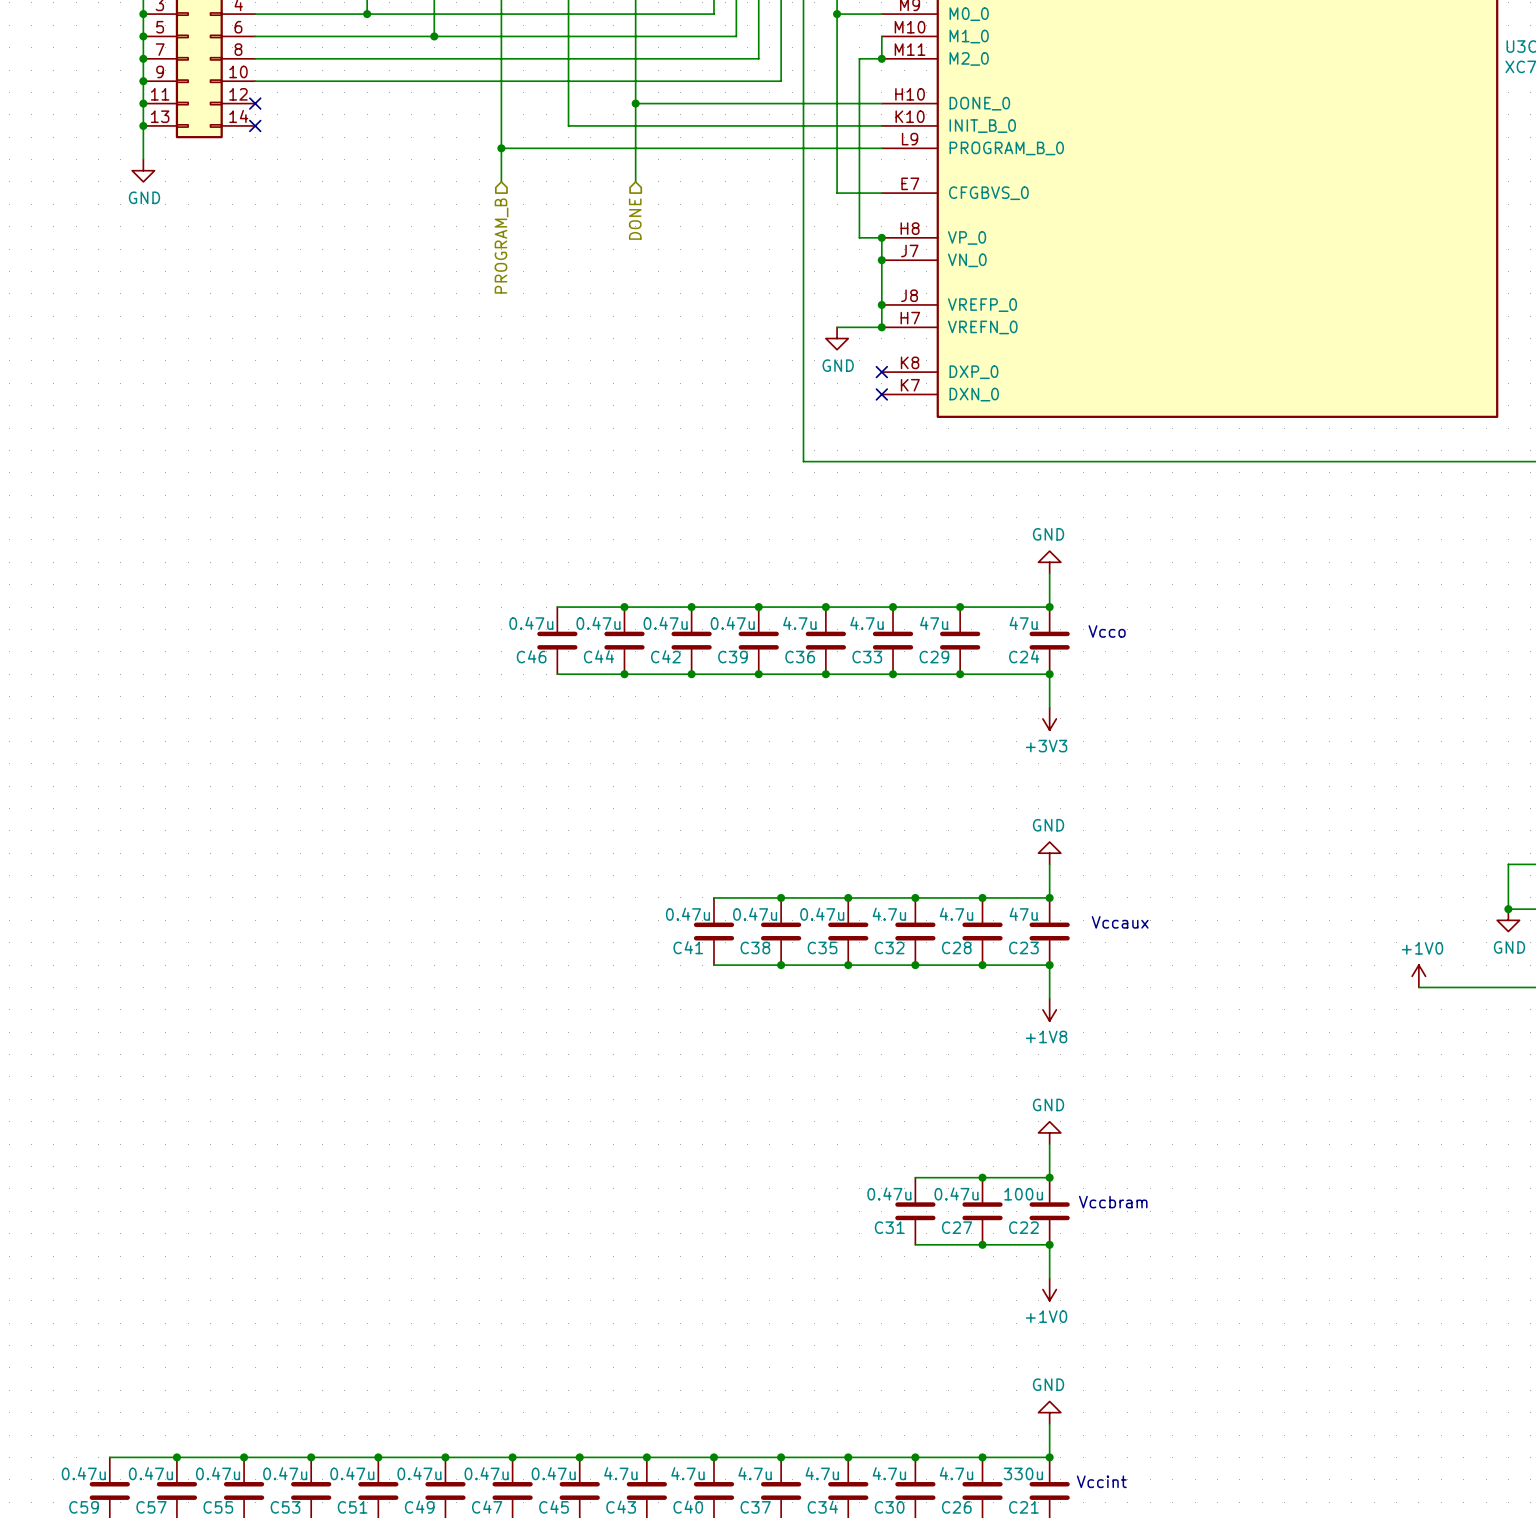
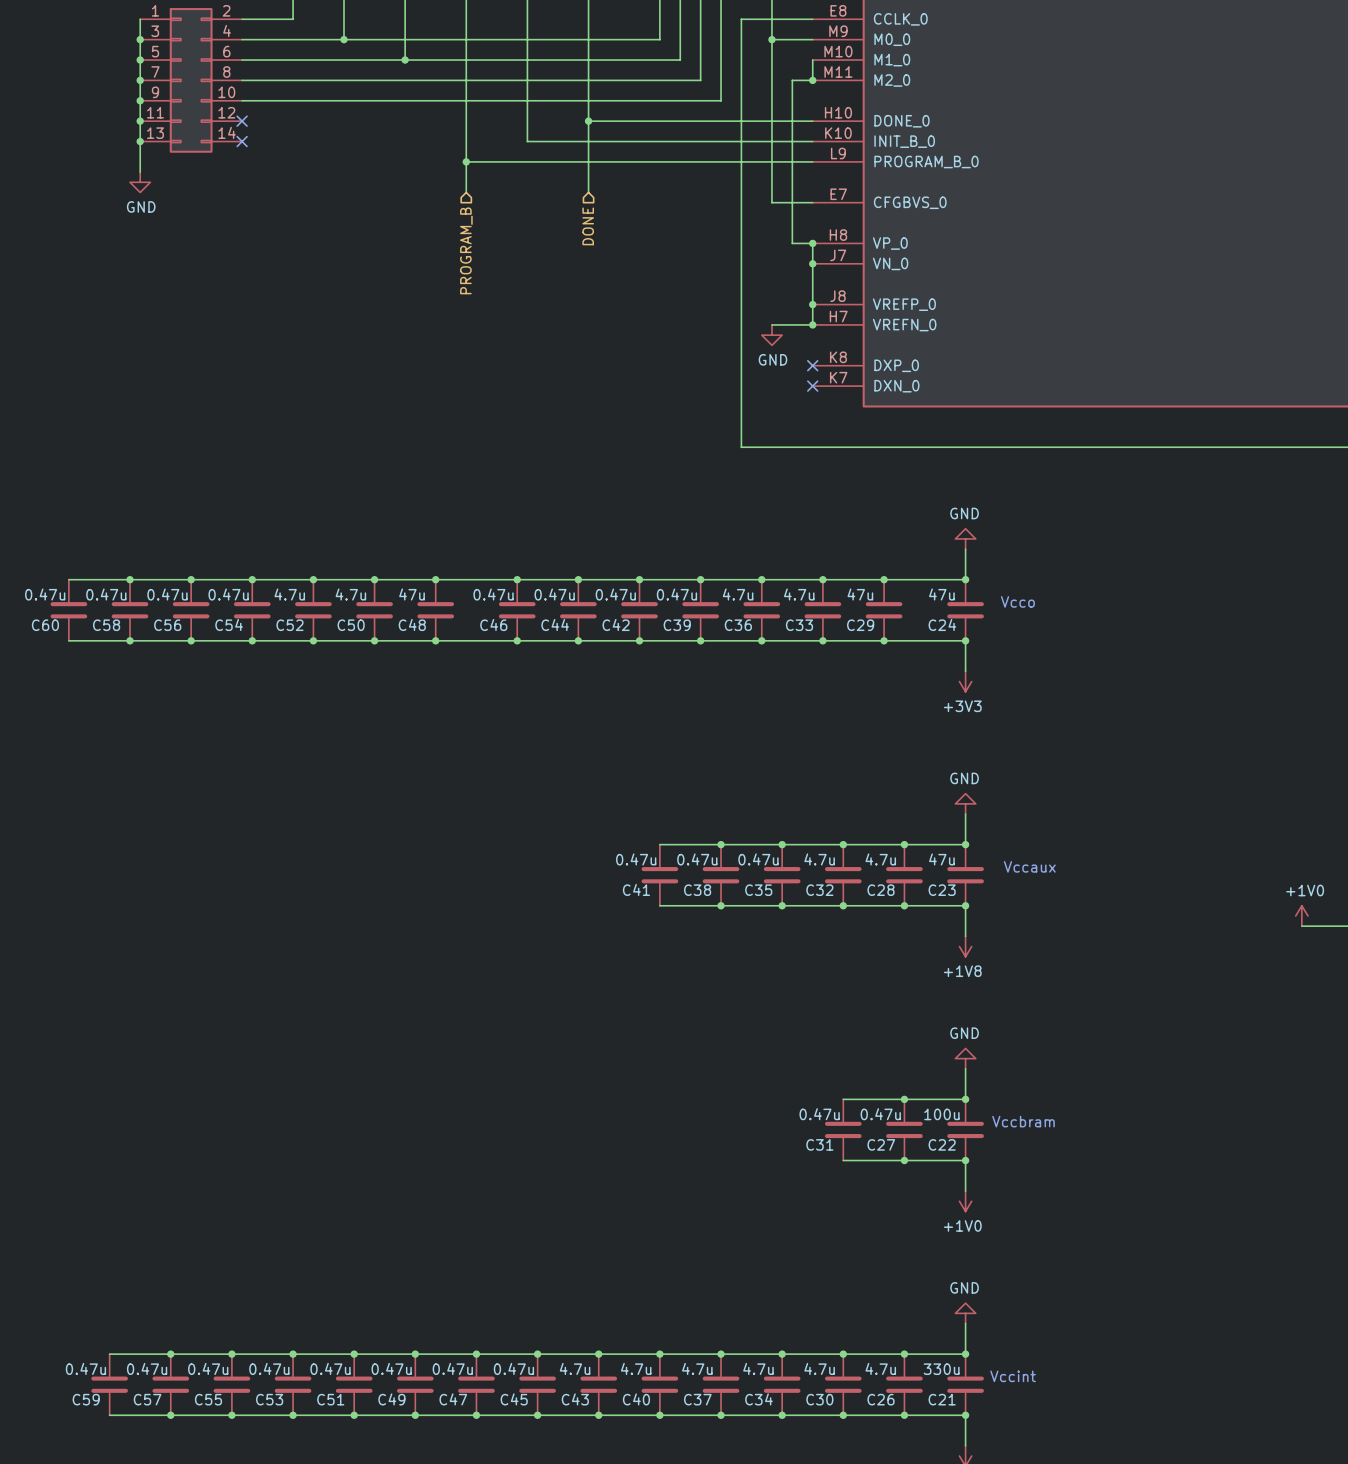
wire: none -> (68, 579) (517, 579)
junction: none -> (130, 579)
junction: none -> (191, 579)
junction: none -> (252, 579)
junction: none -> (313, 579)
junction: none -> (374, 579)
junction: none -> (435, 579)
junction: none -> (517, 579)
C60: none -> 0.47u (68, 610)
C58: none -> 0.47u (130, 610)
C56: none -> 0.47u (191, 610)
C54: none -> 0.47u (252, 610)
C52: none -> 4.7u (313, 610)
C50: none -> 4.7u (374, 610)
C48: none -> 47u (435, 610)
wire: none -> (68, 640) (517, 640)
junction: none -> (130, 640)
junction: none -> (191, 640)
junction: none -> (252, 640)
junction: none -> (313, 640)
junction: none -> (374, 640)
junction: none -> (435, 640)
junction: none -> (517, 640)

